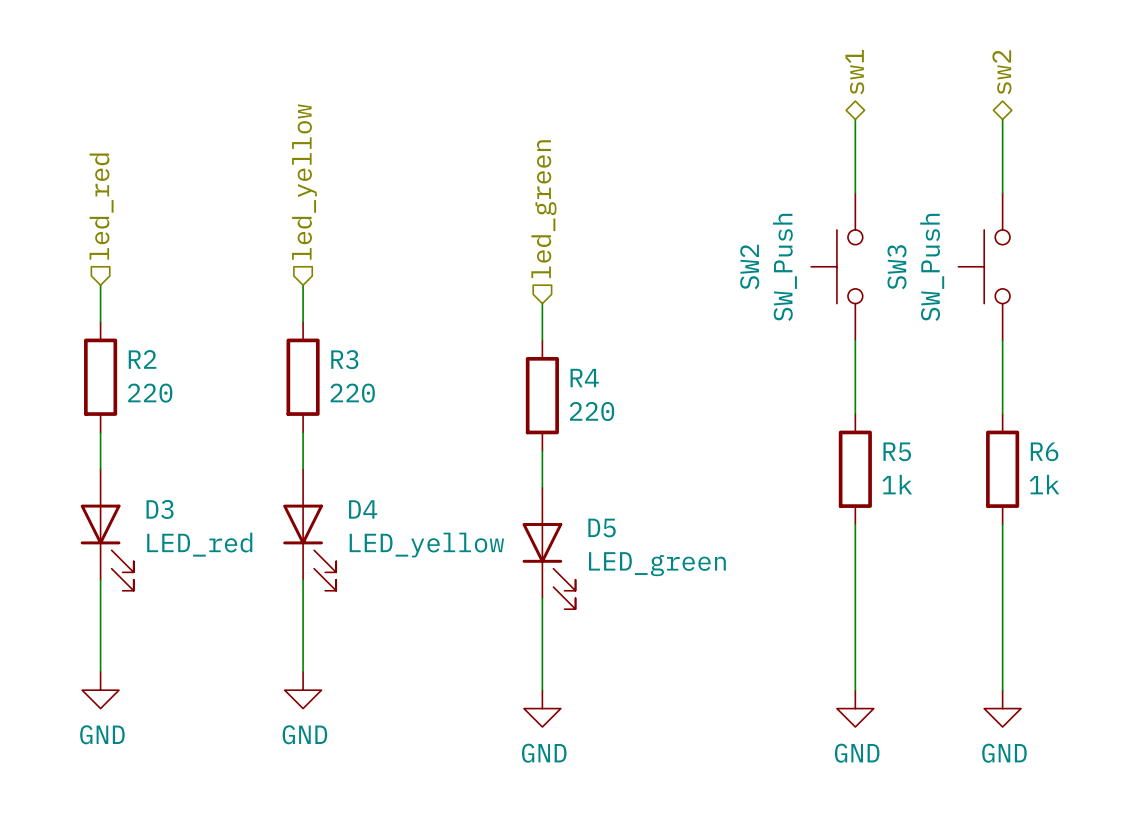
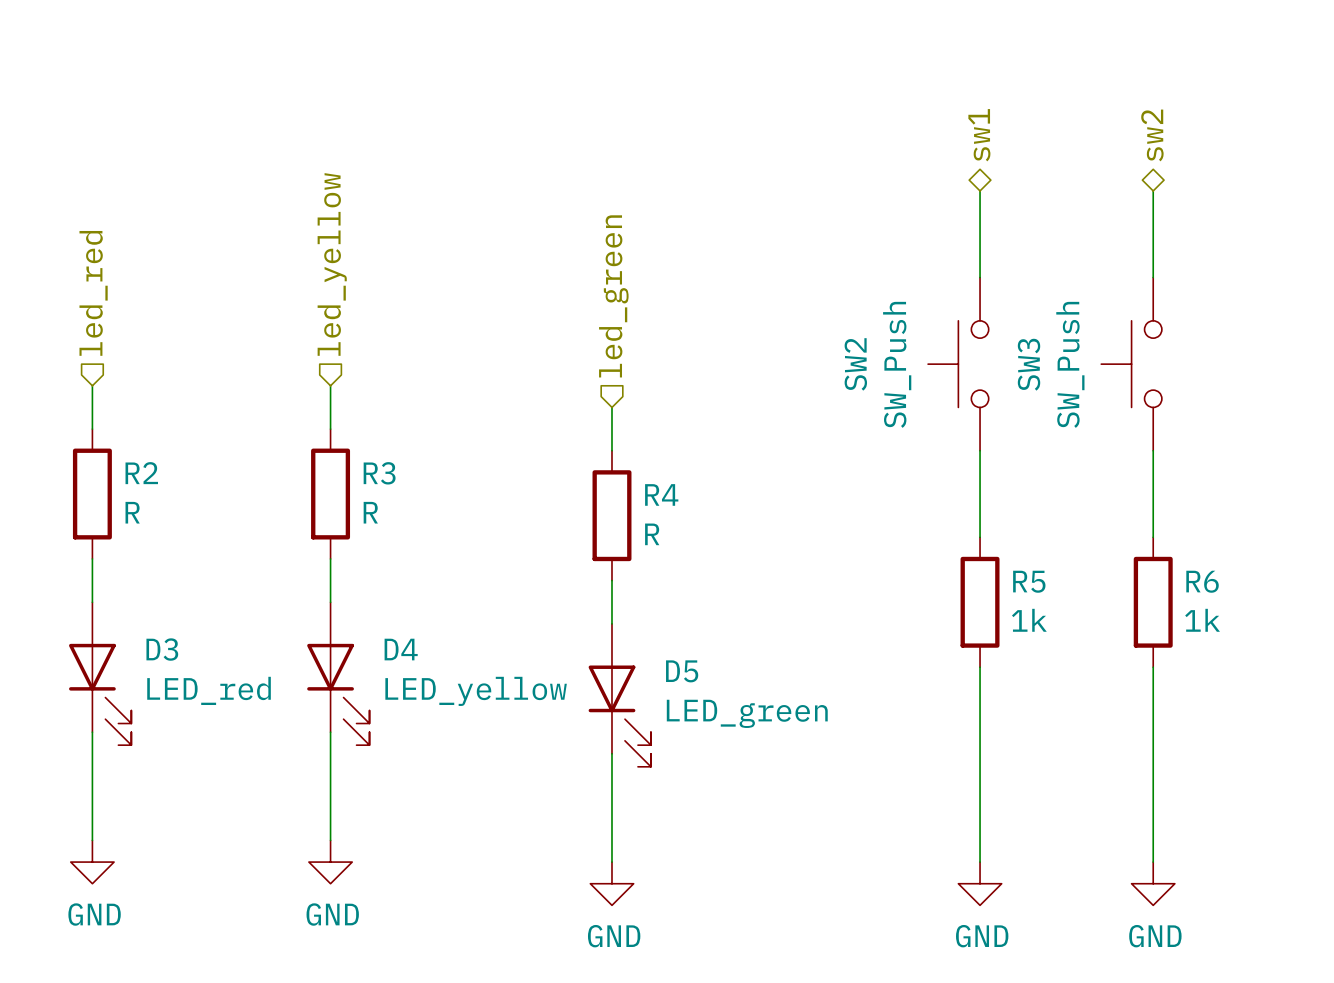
R2 value: 220 (150, 393) -> R (132, 512)
R3 value: 220 (352, 393) -> R (370, 512)
R4 value: 220 (592, 411) -> R (652, 534)

